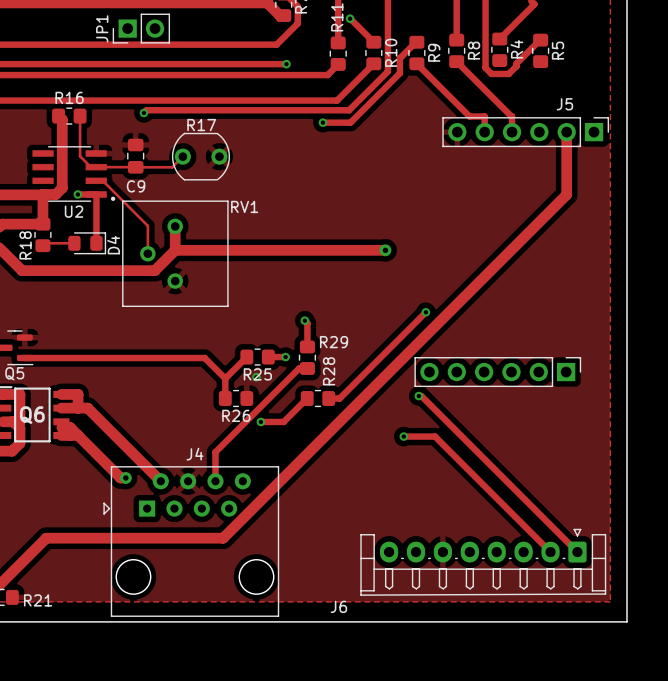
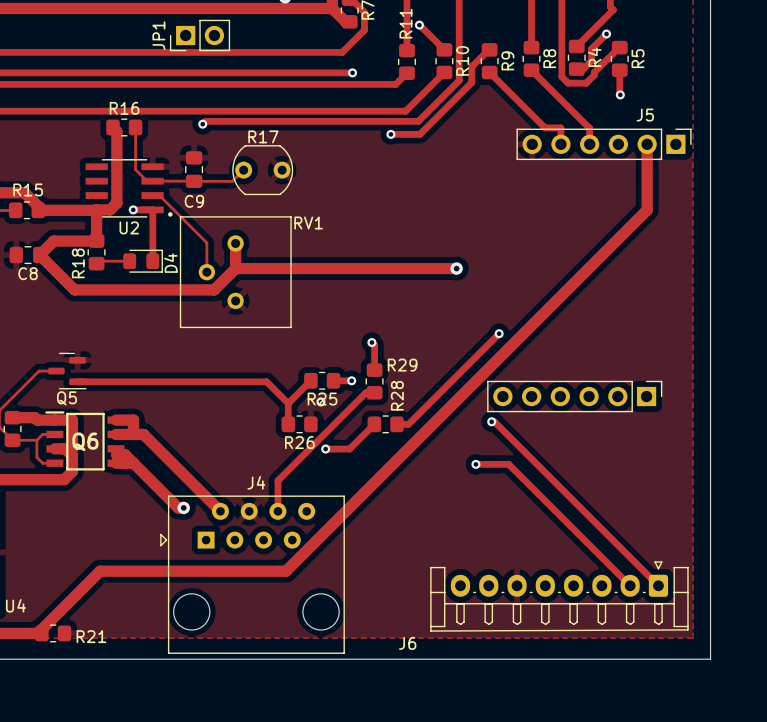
track: none -> (606, 34) (591, 49) (591, 60) (583, 69) (576, 69)
via: none -> (606, 34)
track: none -> (619, 70) (620, 94)
via: none -> (620, 94)

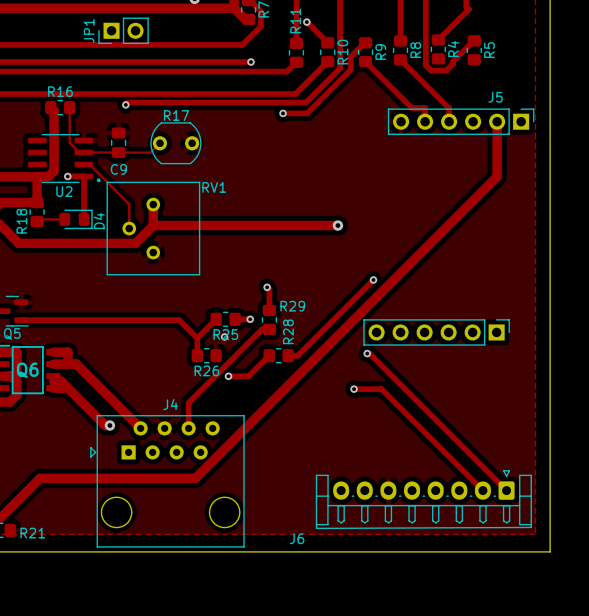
track: (606, 34) (591, 49) (591, 60) (583, 69) (576, 69) -> none
via: (606, 34) -> none
track: (619, 70) (620, 94) -> none
via: (620, 94) -> none

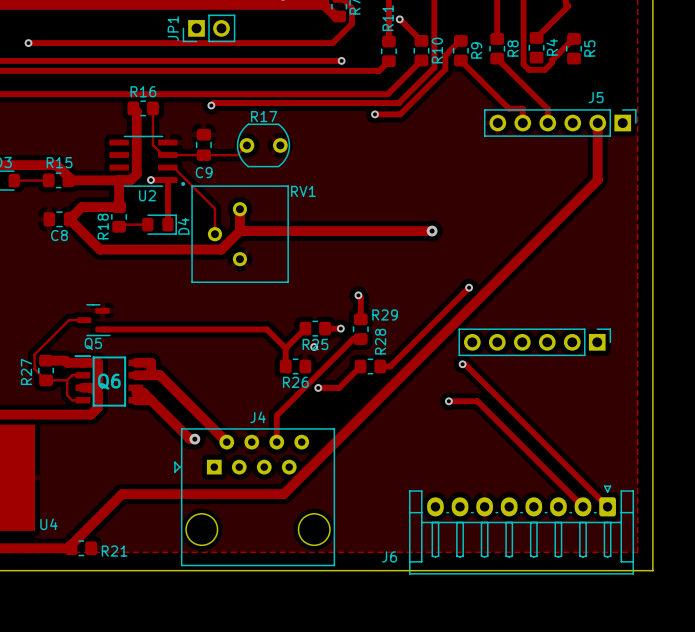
J6 footprint: [315, 470, 532, 529] -> [409, 485, 634, 575]

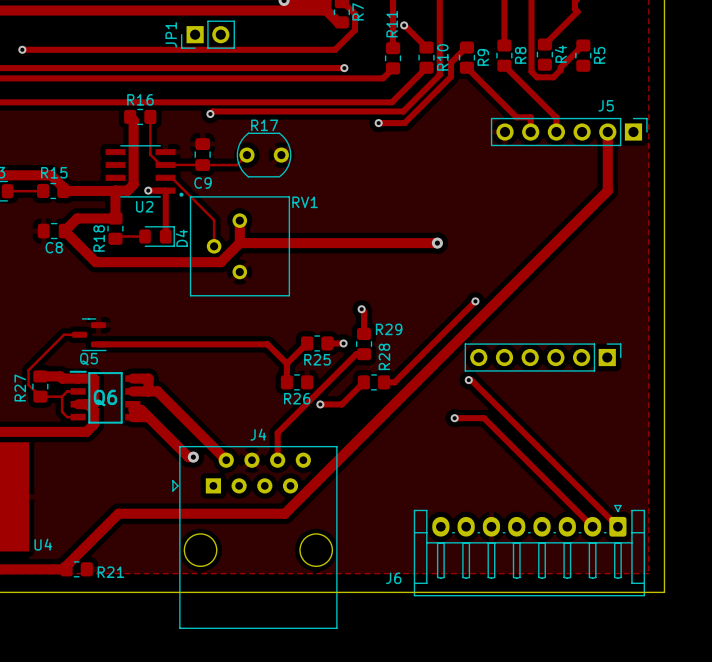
via: (314, 347) -> none
J4 footprint: [174, 428, 335, 567] -> [172, 446, 338, 629]

